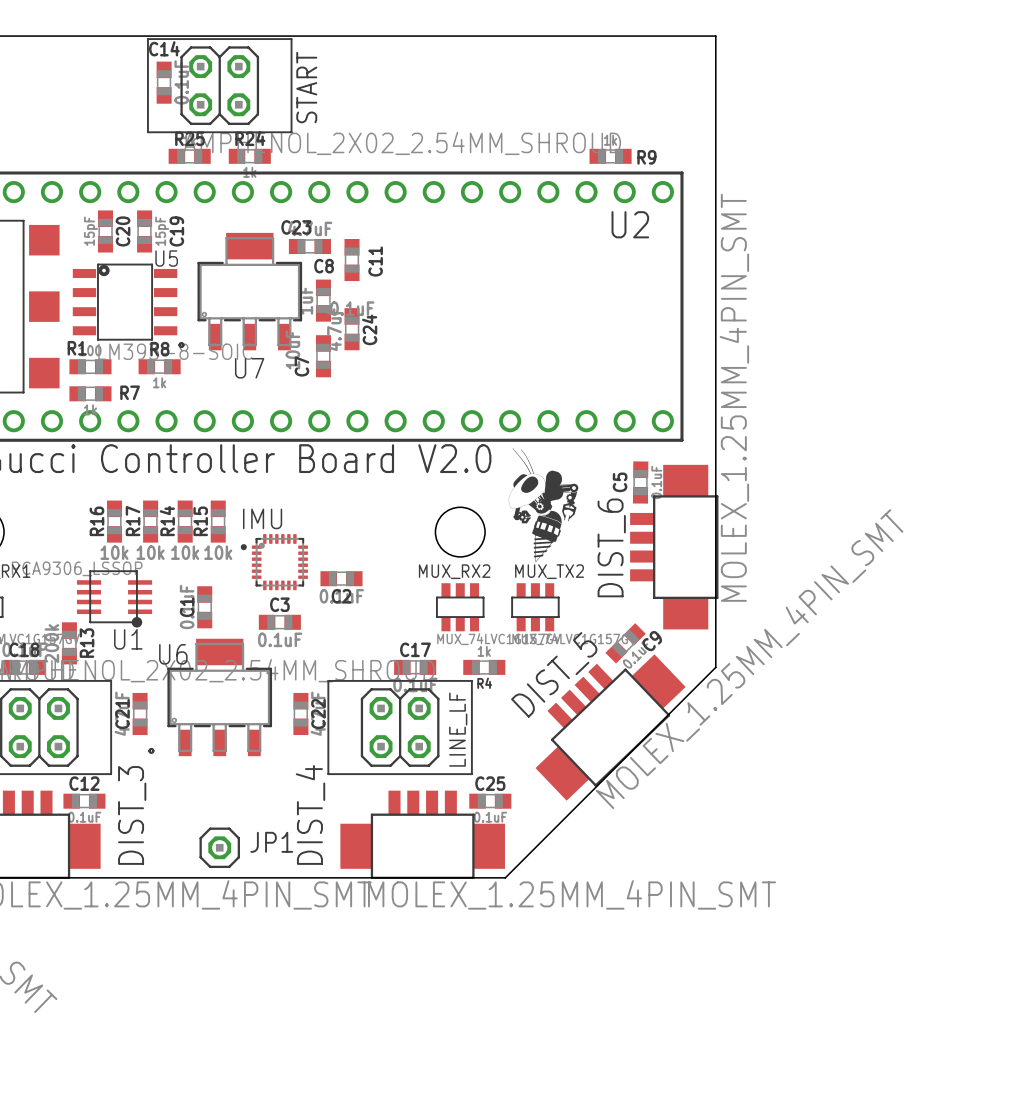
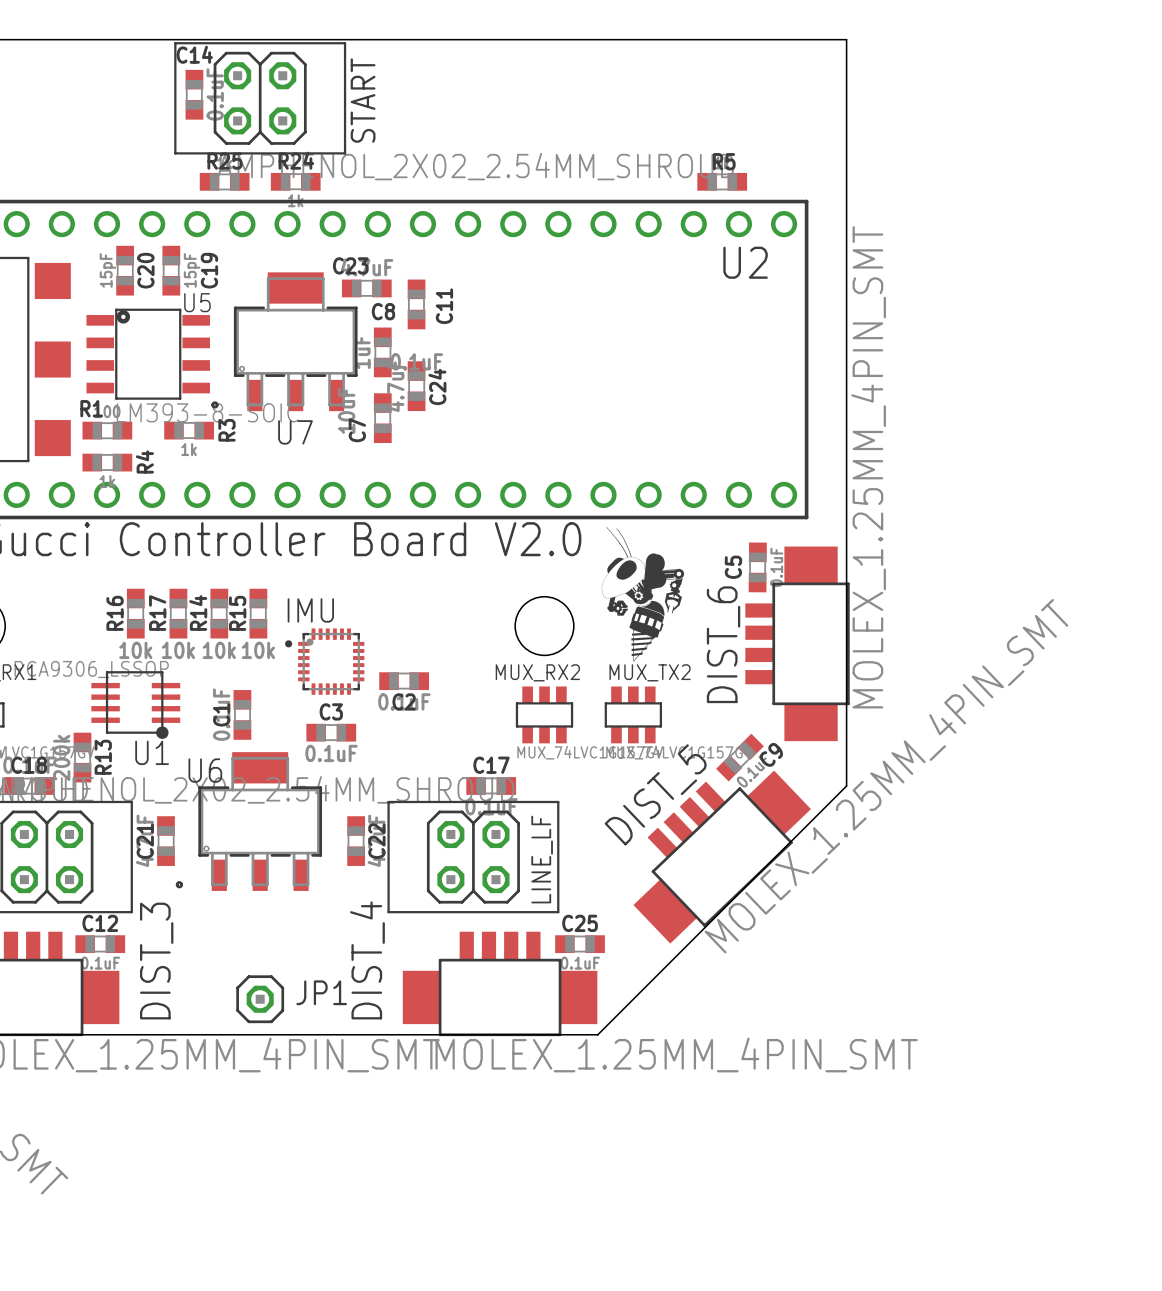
R9 name: R9 (646, 157) -> R5 (724, 161)
R8 name: R8 (159, 349) -> R3 (226, 430)
R7 name: R7 (130, 392) -> R4 (144, 461)
R4: 1k (484, 667) -> none

